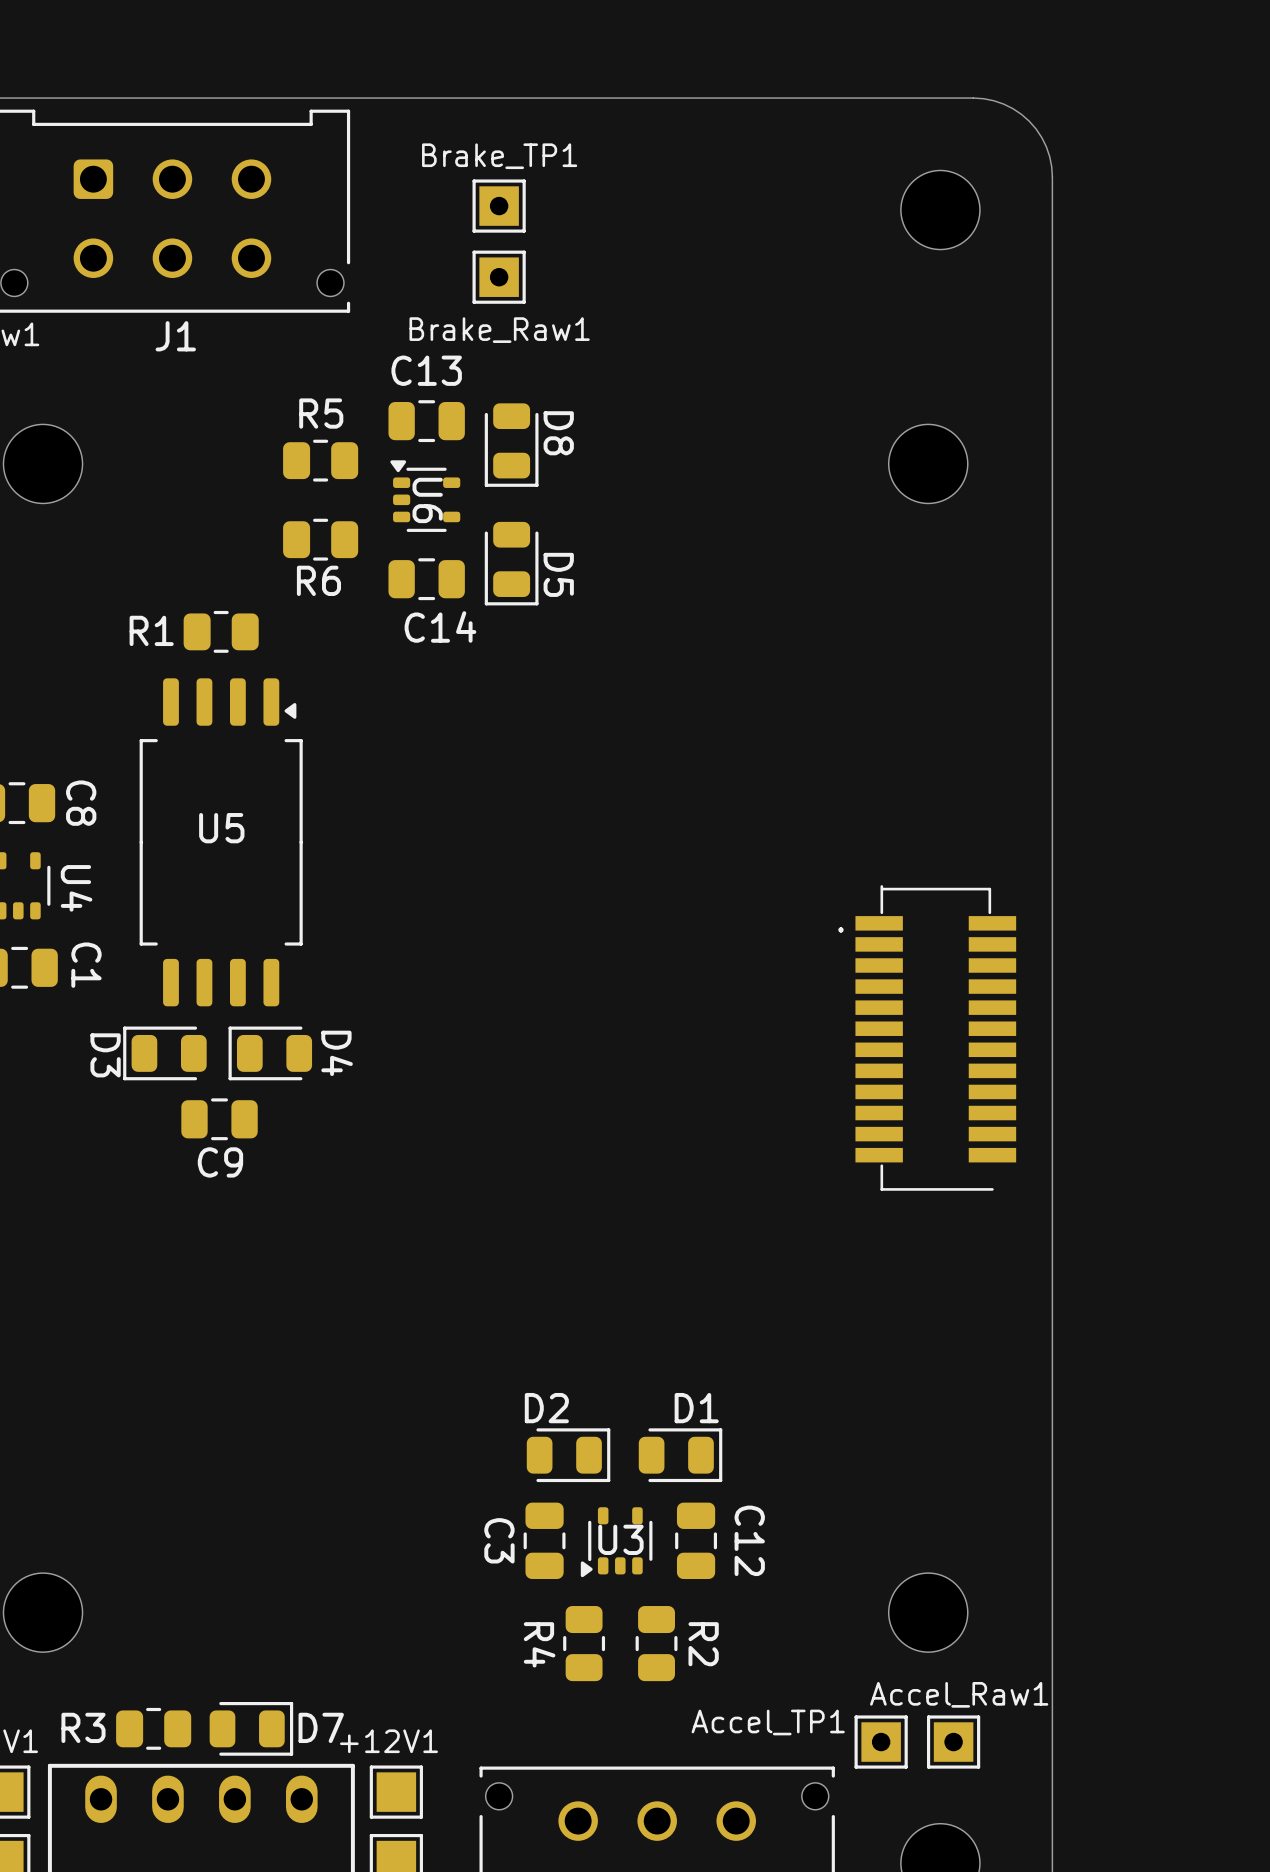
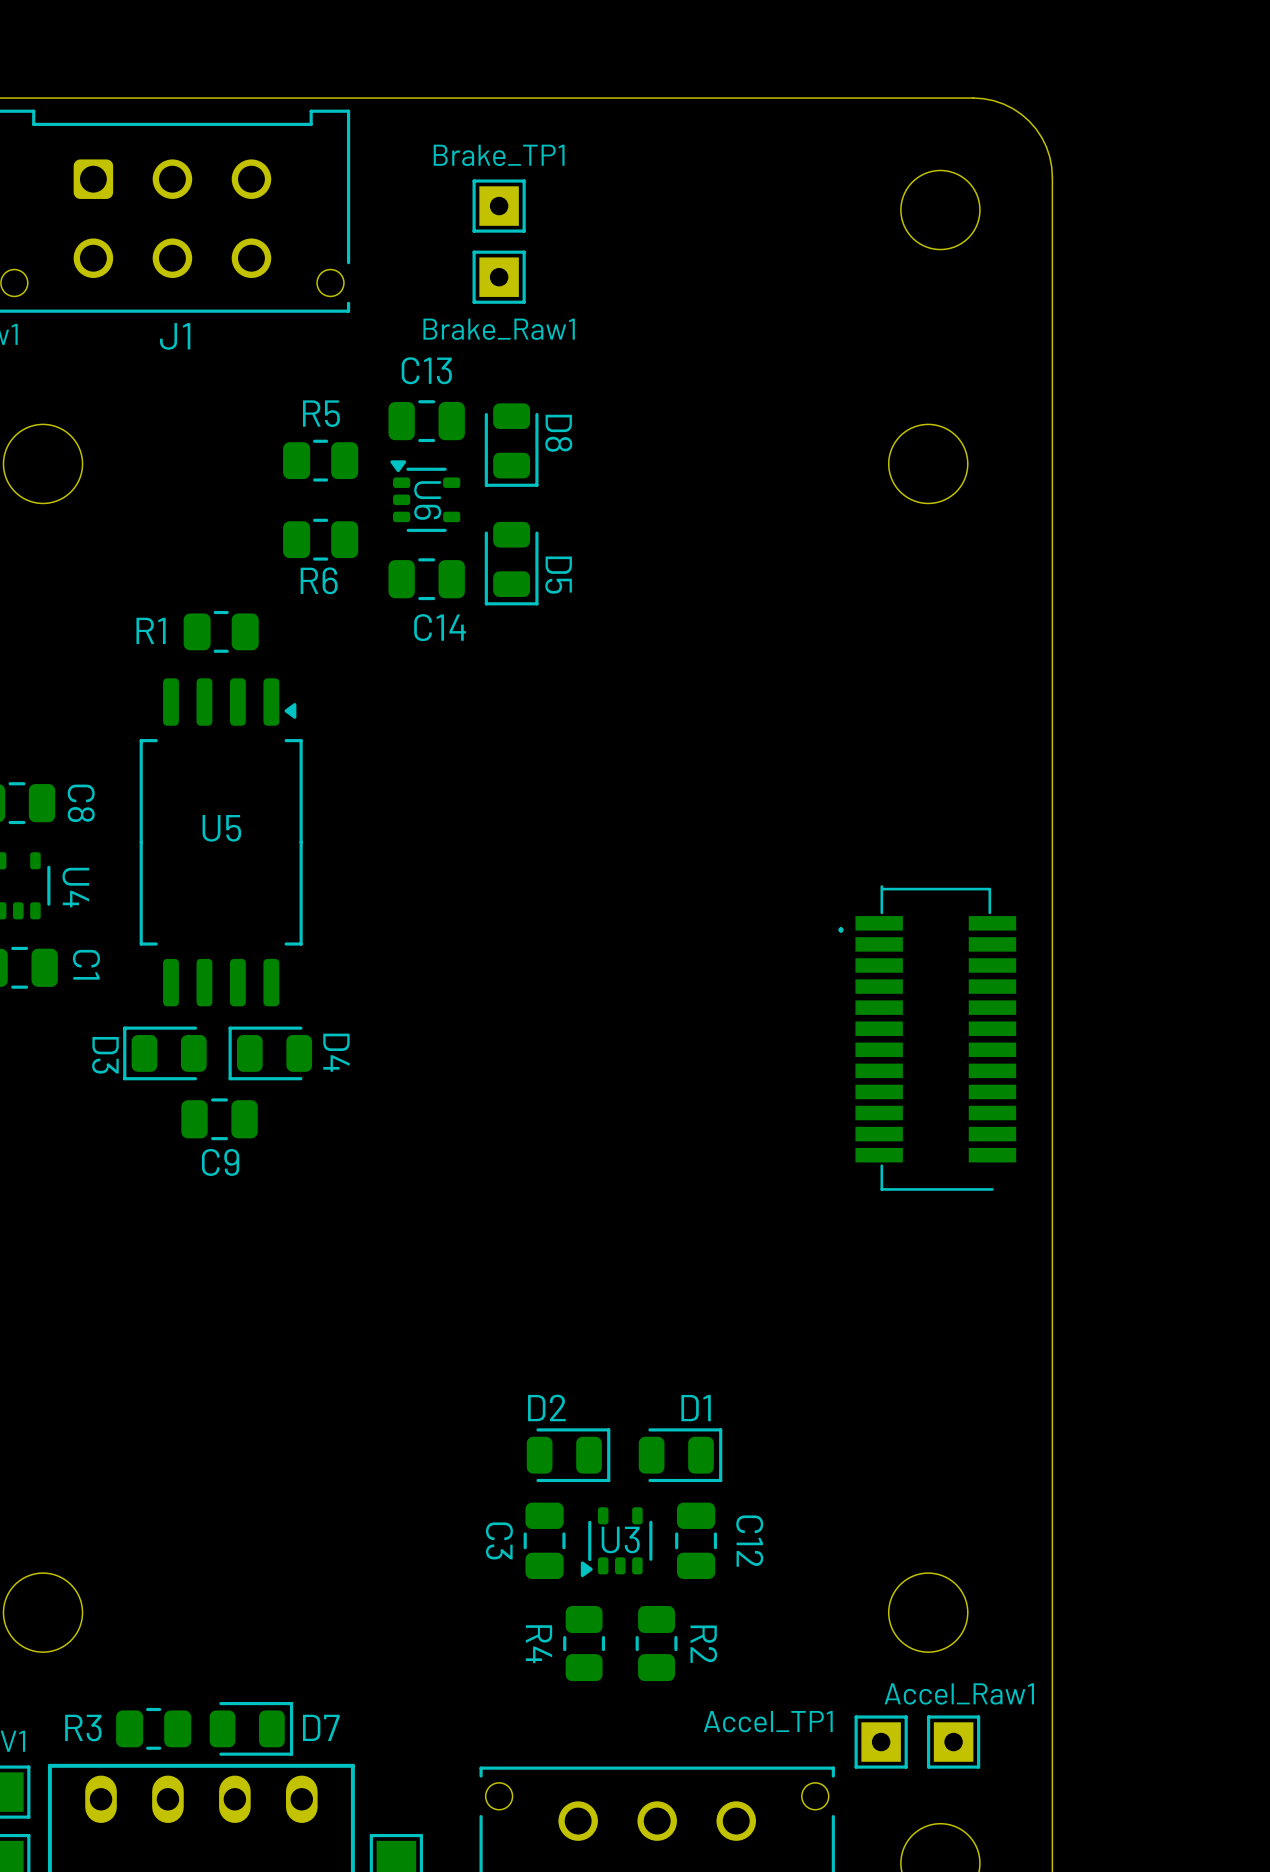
+12V1: (396, 1792) -> none

